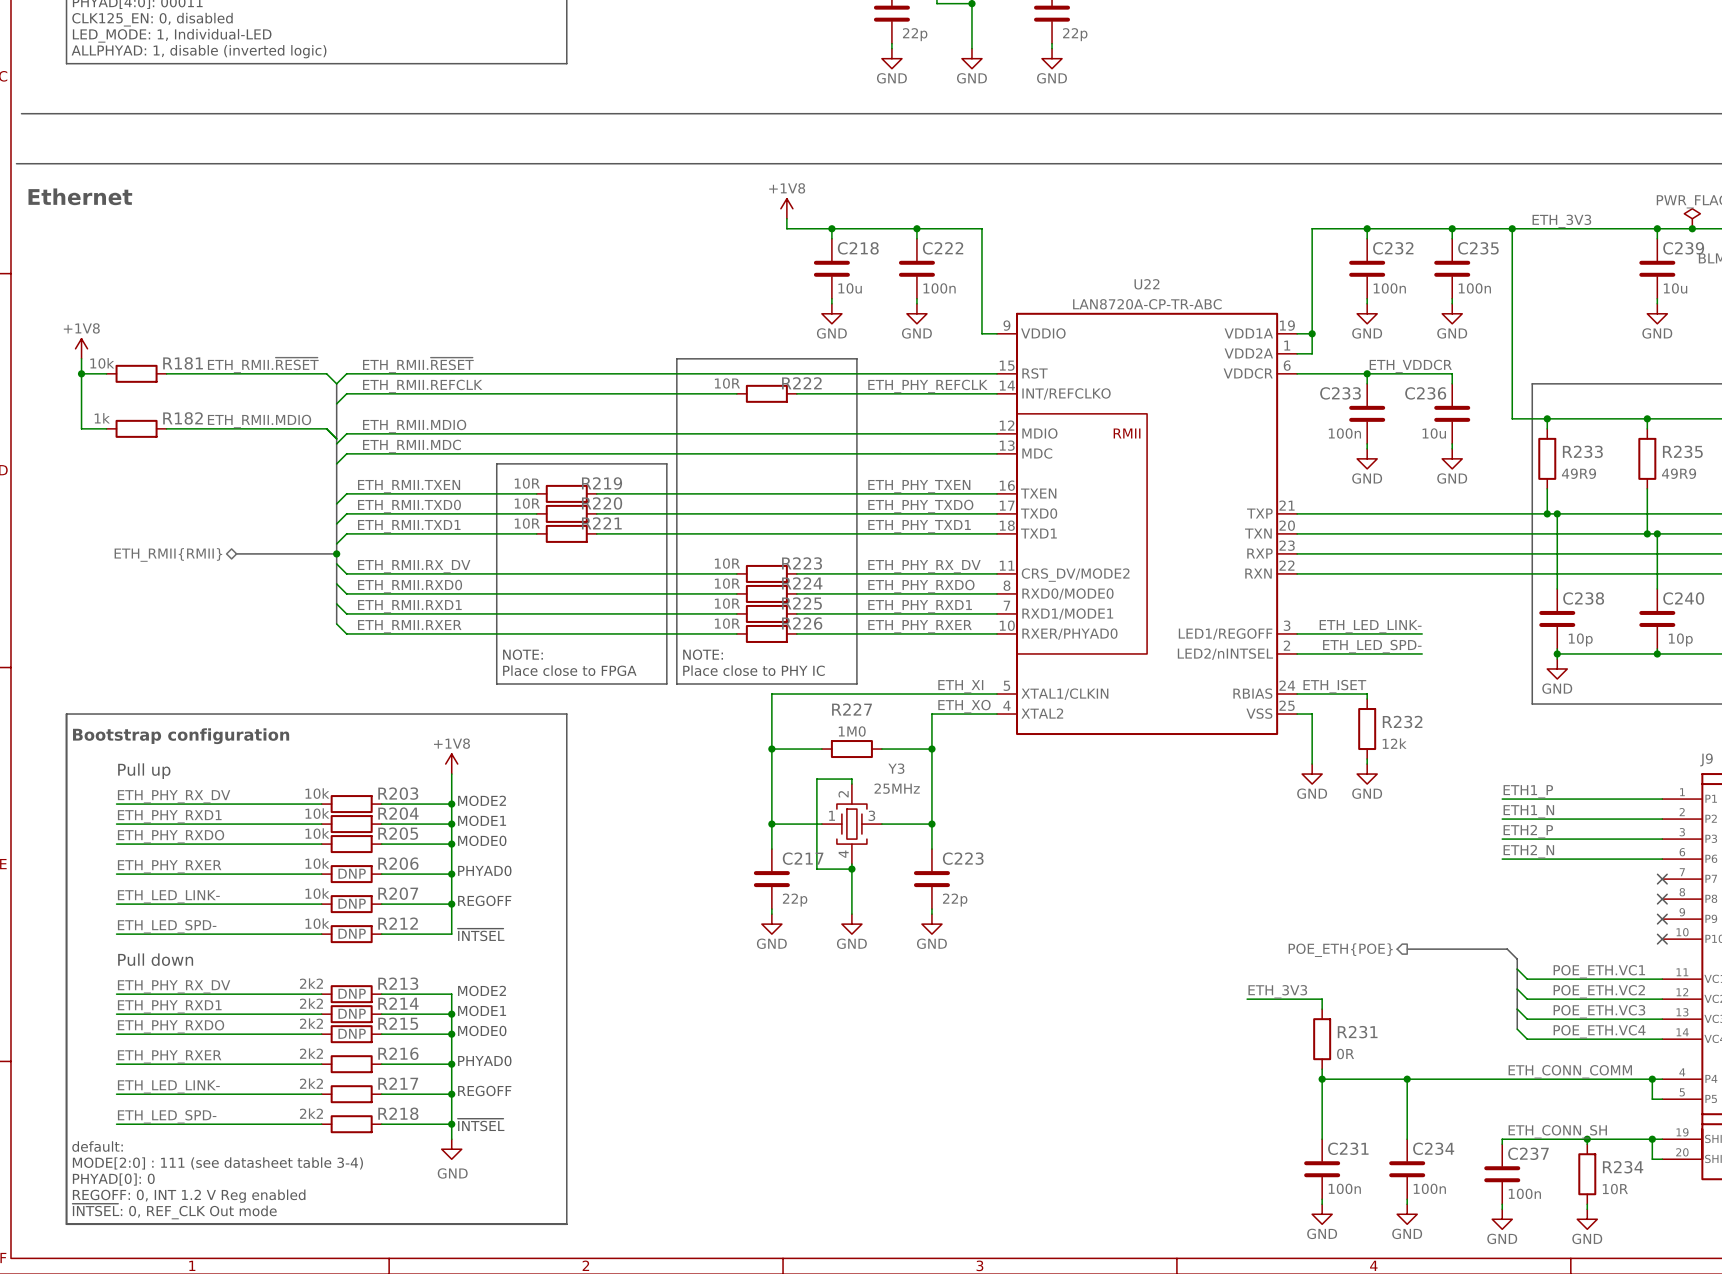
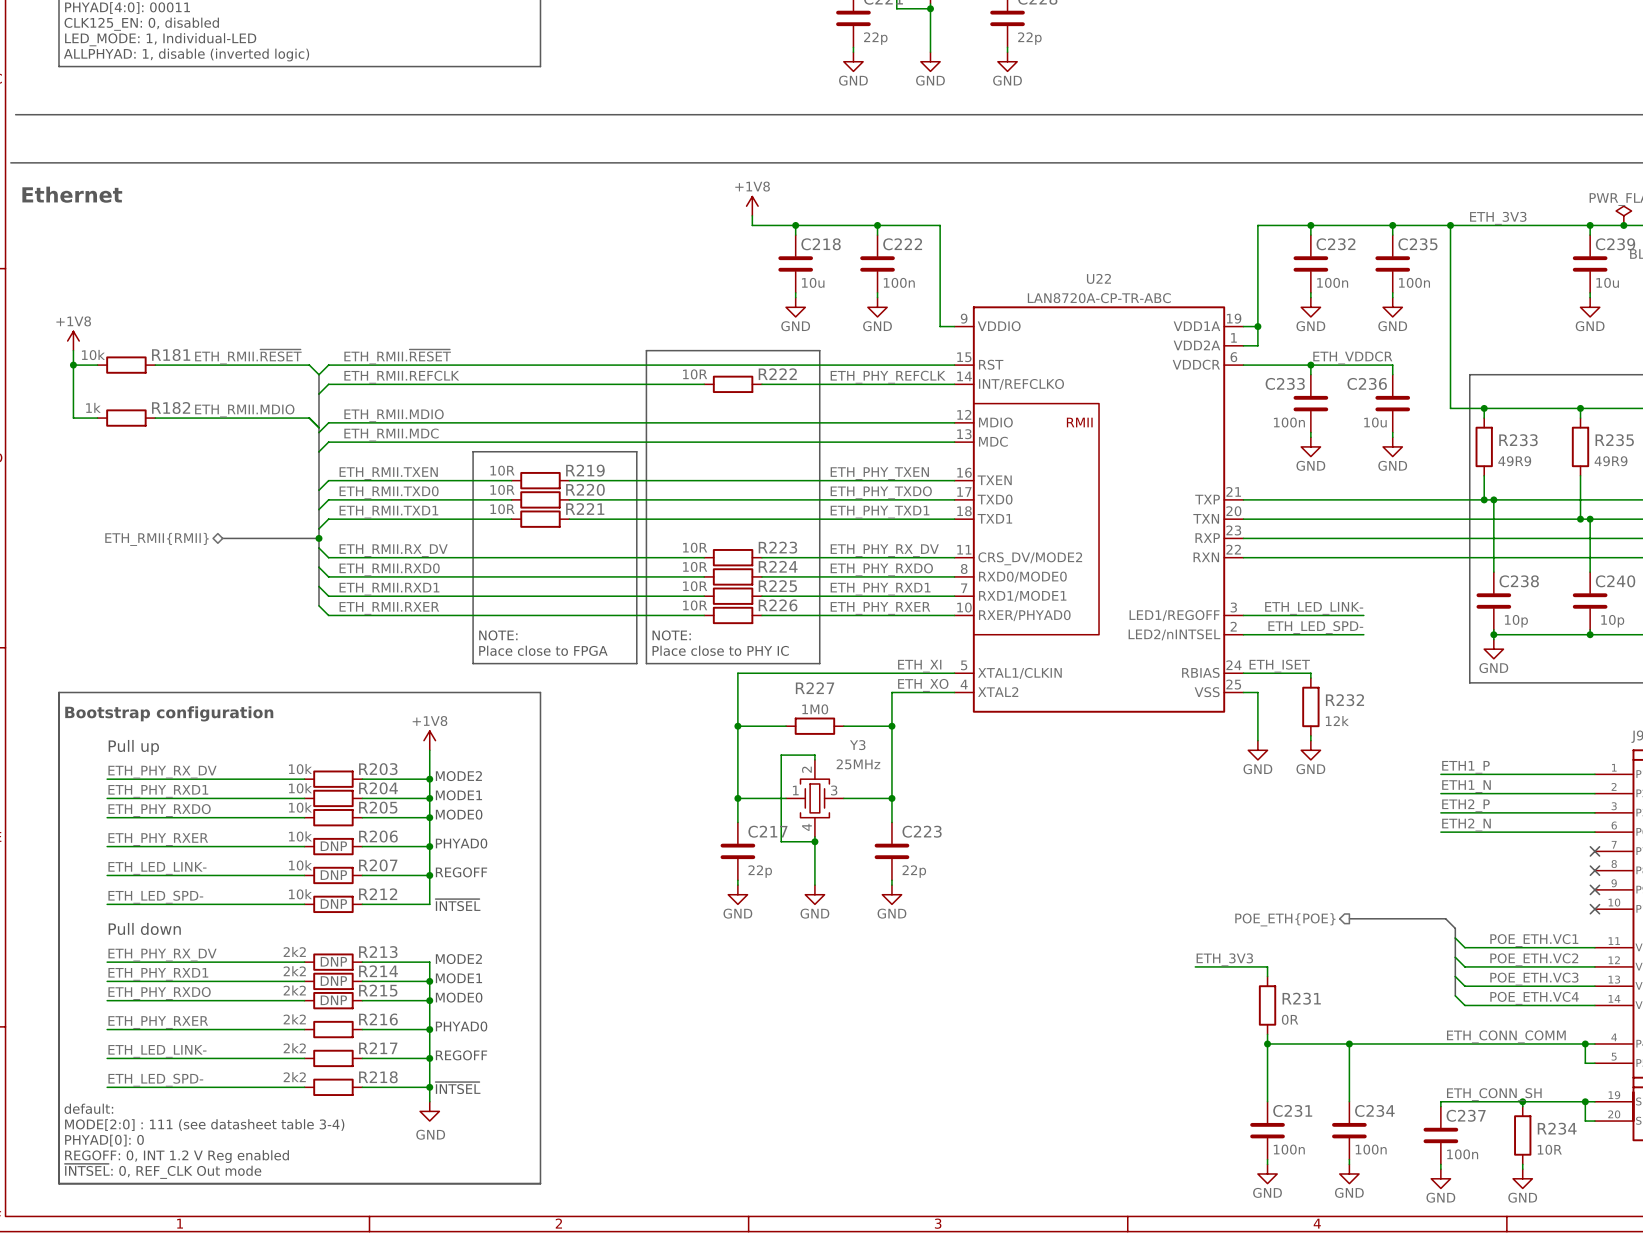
R222 name position: R222 (801, 383) -> R222 (777, 374)
R219 name position: R219 (602, 483) -> R219 (585, 470)
R220 name position: R220 (602, 503) -> R220 (585, 489)
R221 name position: R221 (601, 523) -> R221 (585, 509)
R223 name position: R223 (802, 563) -> R223 (777, 547)
R224 name position: R224 (802, 583) -> R224 (778, 566)
R225 name position: R225 (801, 603) -> R225 (777, 586)
R226 name position: R226 (802, 623) -> R226 (778, 605)

